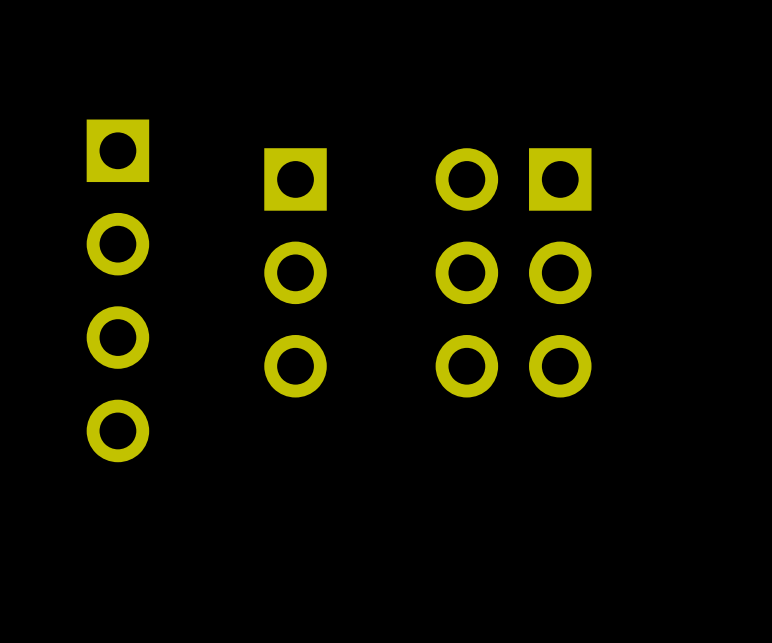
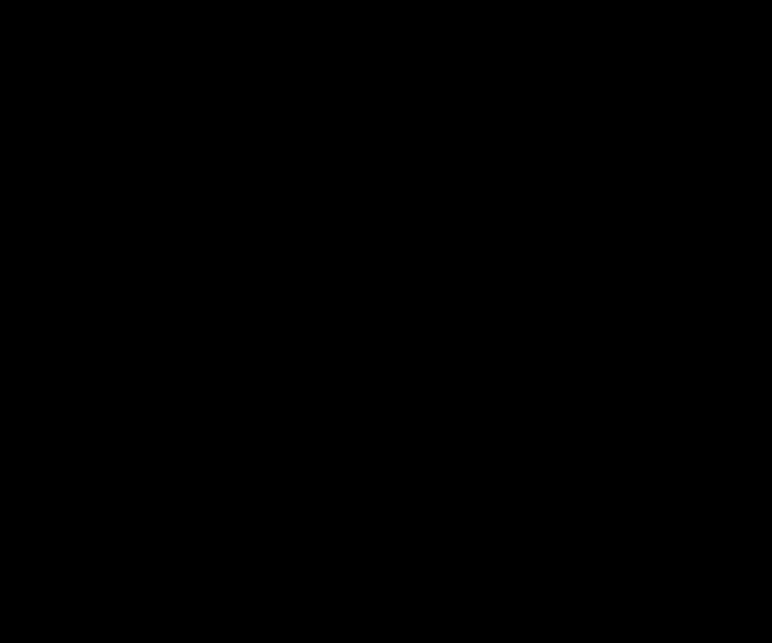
part: (295, 272) -> none
part: (513, 272) -> none
part: (117, 290) -> none

